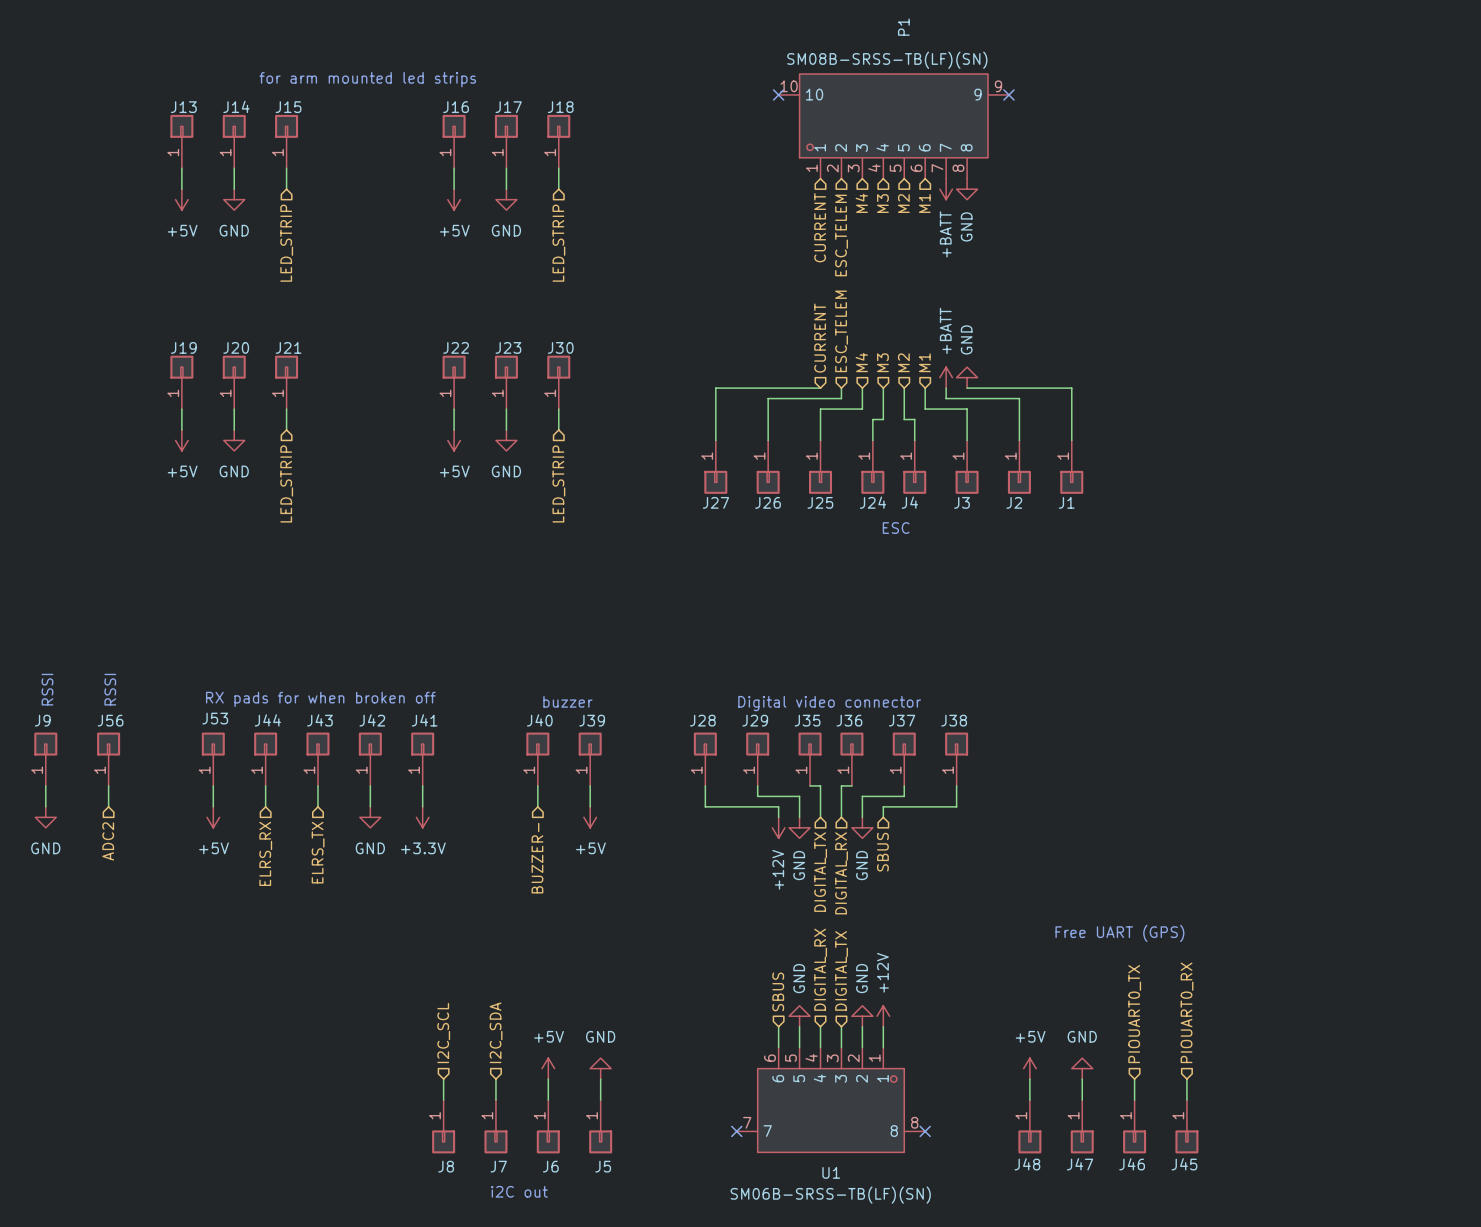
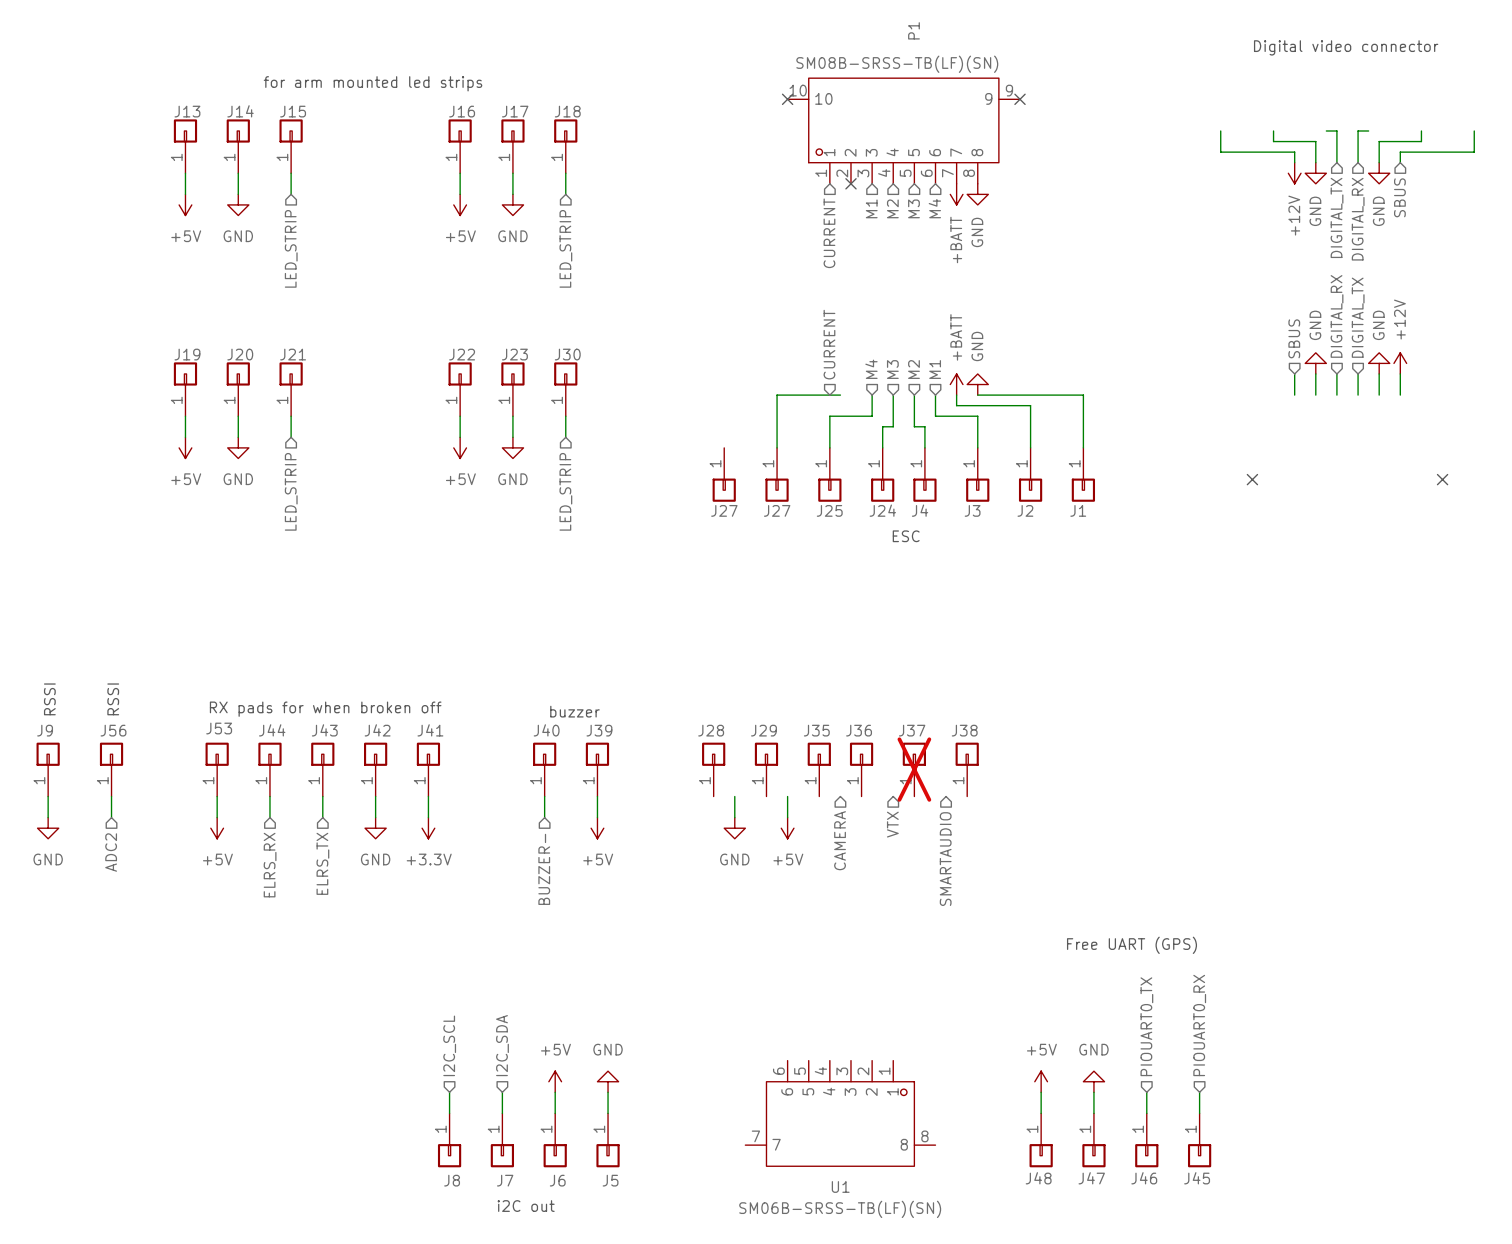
text: none -> Digital video connector (1346, 47)
wire: none -> (1220, 130) (1220, 152) (1294, 152) (1294, 162)
wire: none -> (1273, 130) (1273, 141) (1315, 141) (1315, 162)
wire: none -> (1326, 130) (1336, 130) (1336, 162)
wire: none -> (1368, 130) (1358, 130) (1358, 162)
wire: none -> (1421, 130) (1421, 141) (1379, 141) (1379, 162)
wire: none -> (1474, 130) (1474, 152) (1400, 152) (1400, 162)
power symbol: none -> +12V (1294, 173)
power symbol: none -> GND (1315, 173)
power symbol: none -> GND (1379, 173)
no-connect mark: none -> (850, 183)
hierarchical label: none -> SBUS (1399, 197)
hierarchical label: M4 (861, 203) -> M1 (871, 208)
hierarchical label: M3 (882, 203) -> M2 (892, 208)
hierarchical label: M2 (903, 203) -> M3 (913, 208)
hierarchical label: M1 (924, 203) -> M4 (934, 208)
hierarchical label: none -> DIGITAL_TX (1337, 217)
hierarchical label: none -> DIGITAL_RX (1358, 219)
hierarchical label: ESC_TELEM (841, 235) -> none
hierarchical label: none -> DIGITAL_RX (1337, 316)
hierarchical label: none -> DIGITAL_TX (1358, 317)
hierarchical label: ESC_TELEM (841, 331) -> none
hierarchical label: none -> SBUS (1294, 338)
power symbol: none -> GND (1315, 363)
power symbol: none -> GND (1379, 363)
power symbol: none -> +12V (1400, 363)
wire: none -> (1294, 373) (1294, 395)
wire: none -> (1315, 373) (1315, 395)
wire: none -> (1336, 373) (1336, 395)
wire: none -> (1358, 373) (1358, 395)
wire: none -> (1379, 373) (1379, 395)
wire: none -> (1400, 373) (1400, 395)
wire: (768, 388) (715, 388) (715, 440) -> (777, 395) (777, 405)
wire: none -> (829, 395) (840, 395)
wire: (841, 388) (841, 398) (768, 398) -> none
no-connect mark: none -> (1252, 479)
no-connect mark: none -> (1442, 479)
J26 name: J26 (768, 502) -> J27 (777, 510)
text: Digital video connector (829, 703) -> none
J37 do-not-place cross: none -> (914, 769)
wire: (705, 785) (705, 806) (778, 806) (778, 817) -> none
wire: none -> (734, 796) (734, 817)
wire: (757, 785) (757, 796) (799, 796) (799, 817) -> none
wire: none -> (787, 796) (787, 817)
wire: (810, 785) (820, 785) (820, 817) -> none
wire: (851, 785) (841, 785) (841, 817) -> none
wire: (904, 785) (904, 796) (862, 796) (862, 817) -> none
wire: (956, 785) (956, 806) (883, 806) (883, 817) -> none
hierarchical label: none -> VTX (892, 824)
power symbol: none -> GND (734, 828)
power symbol: none -> +5V (787, 828)
power symbol: +12V (778, 827) -> none
power symbol: GND (799, 827) -> none
power symbol: GND (862, 827) -> none
hierarchical label: none -> CAMERA (840, 840)
hierarchical label: none -> SMARTAUDIO (945, 859)
hierarchical label: SBUS (882, 852) -> none
hierarchical label: DIGITAL_TX (820, 872) -> none
hierarchical label: DIGITAL_RX (841, 873) -> none
hierarchical label: DIGITAL_RX (820, 969) -> none
hierarchical label: DIGITAL_TX (841, 970) -> none
hierarchical label: SBUS (778, 991) -> none
power symbol: GND (799, 1016) -> none
power symbol: GND (862, 1016) -> none
power symbol: +12V (883, 1016) -> none
wire: (778, 1026) (778, 1047) -> none
wire: (799, 1026) (799, 1047) -> none
wire: (820, 1026) (820, 1047) -> none
wire: (841, 1026) (841, 1047) -> none
wire: (862, 1026) (862, 1047) -> none
wire: (883, 1026) (883, 1047) -> none
no-connect mark: (736, 1131) -> none
no-connect mark: (925, 1131) -> none

